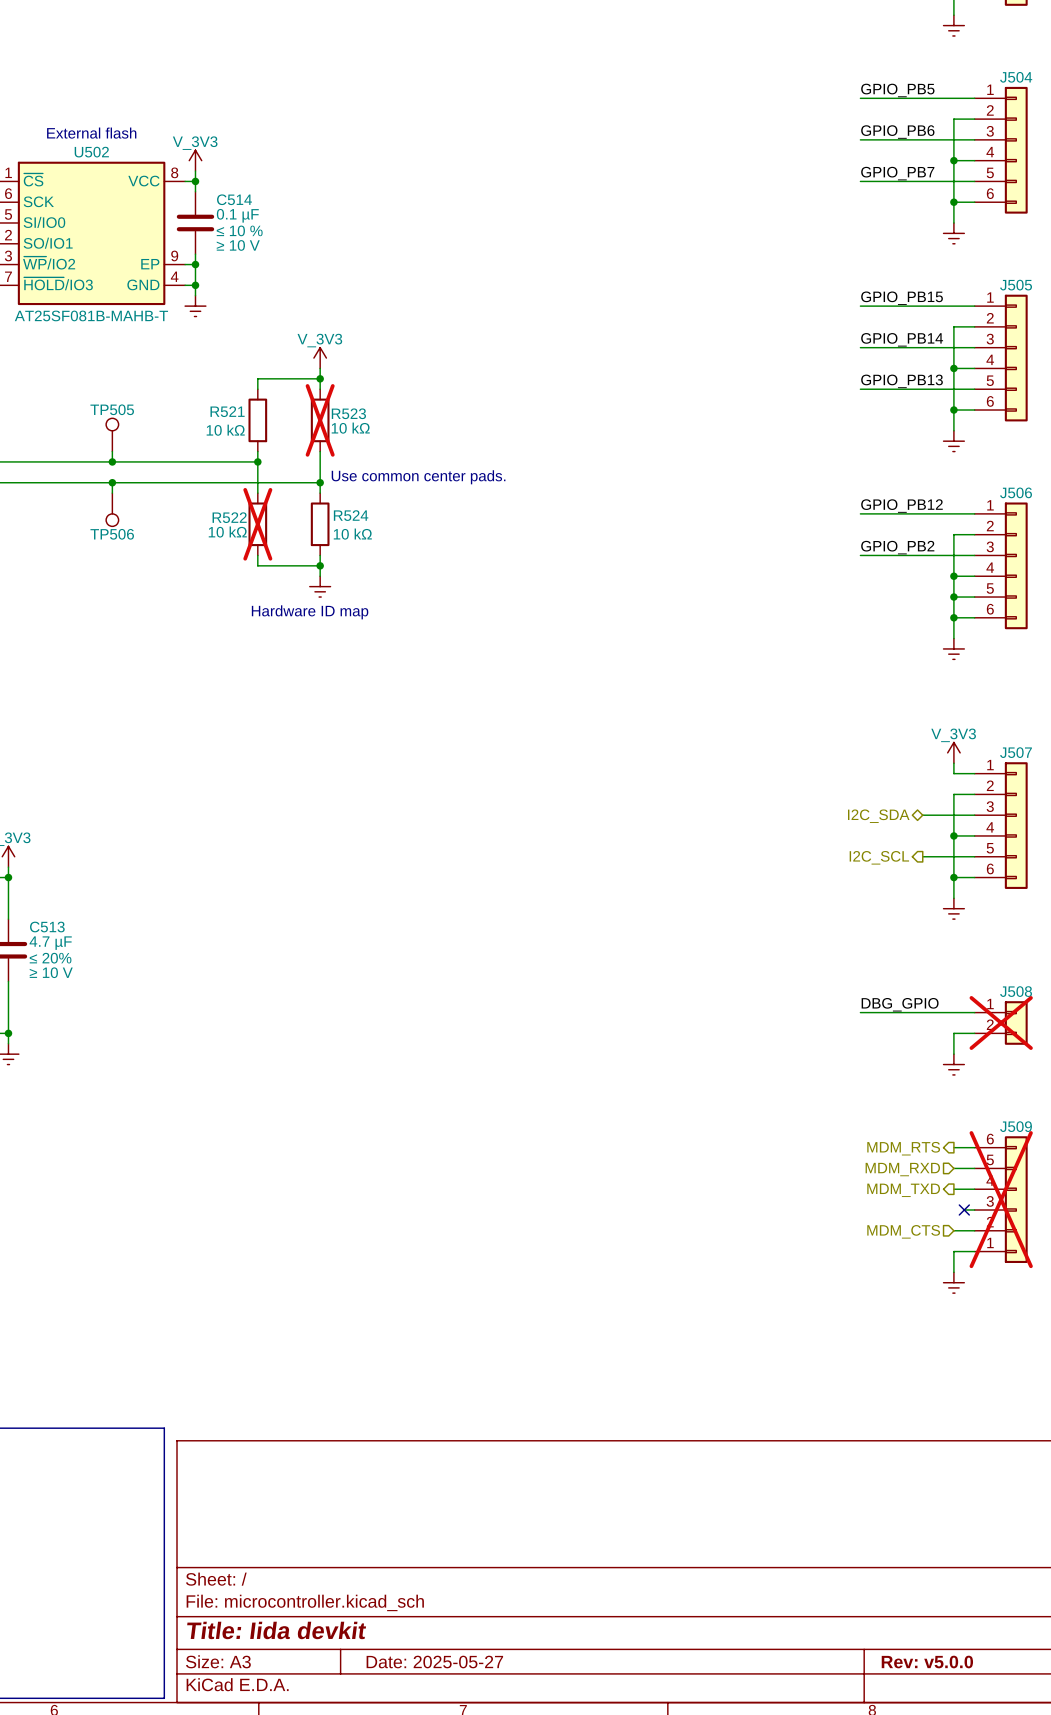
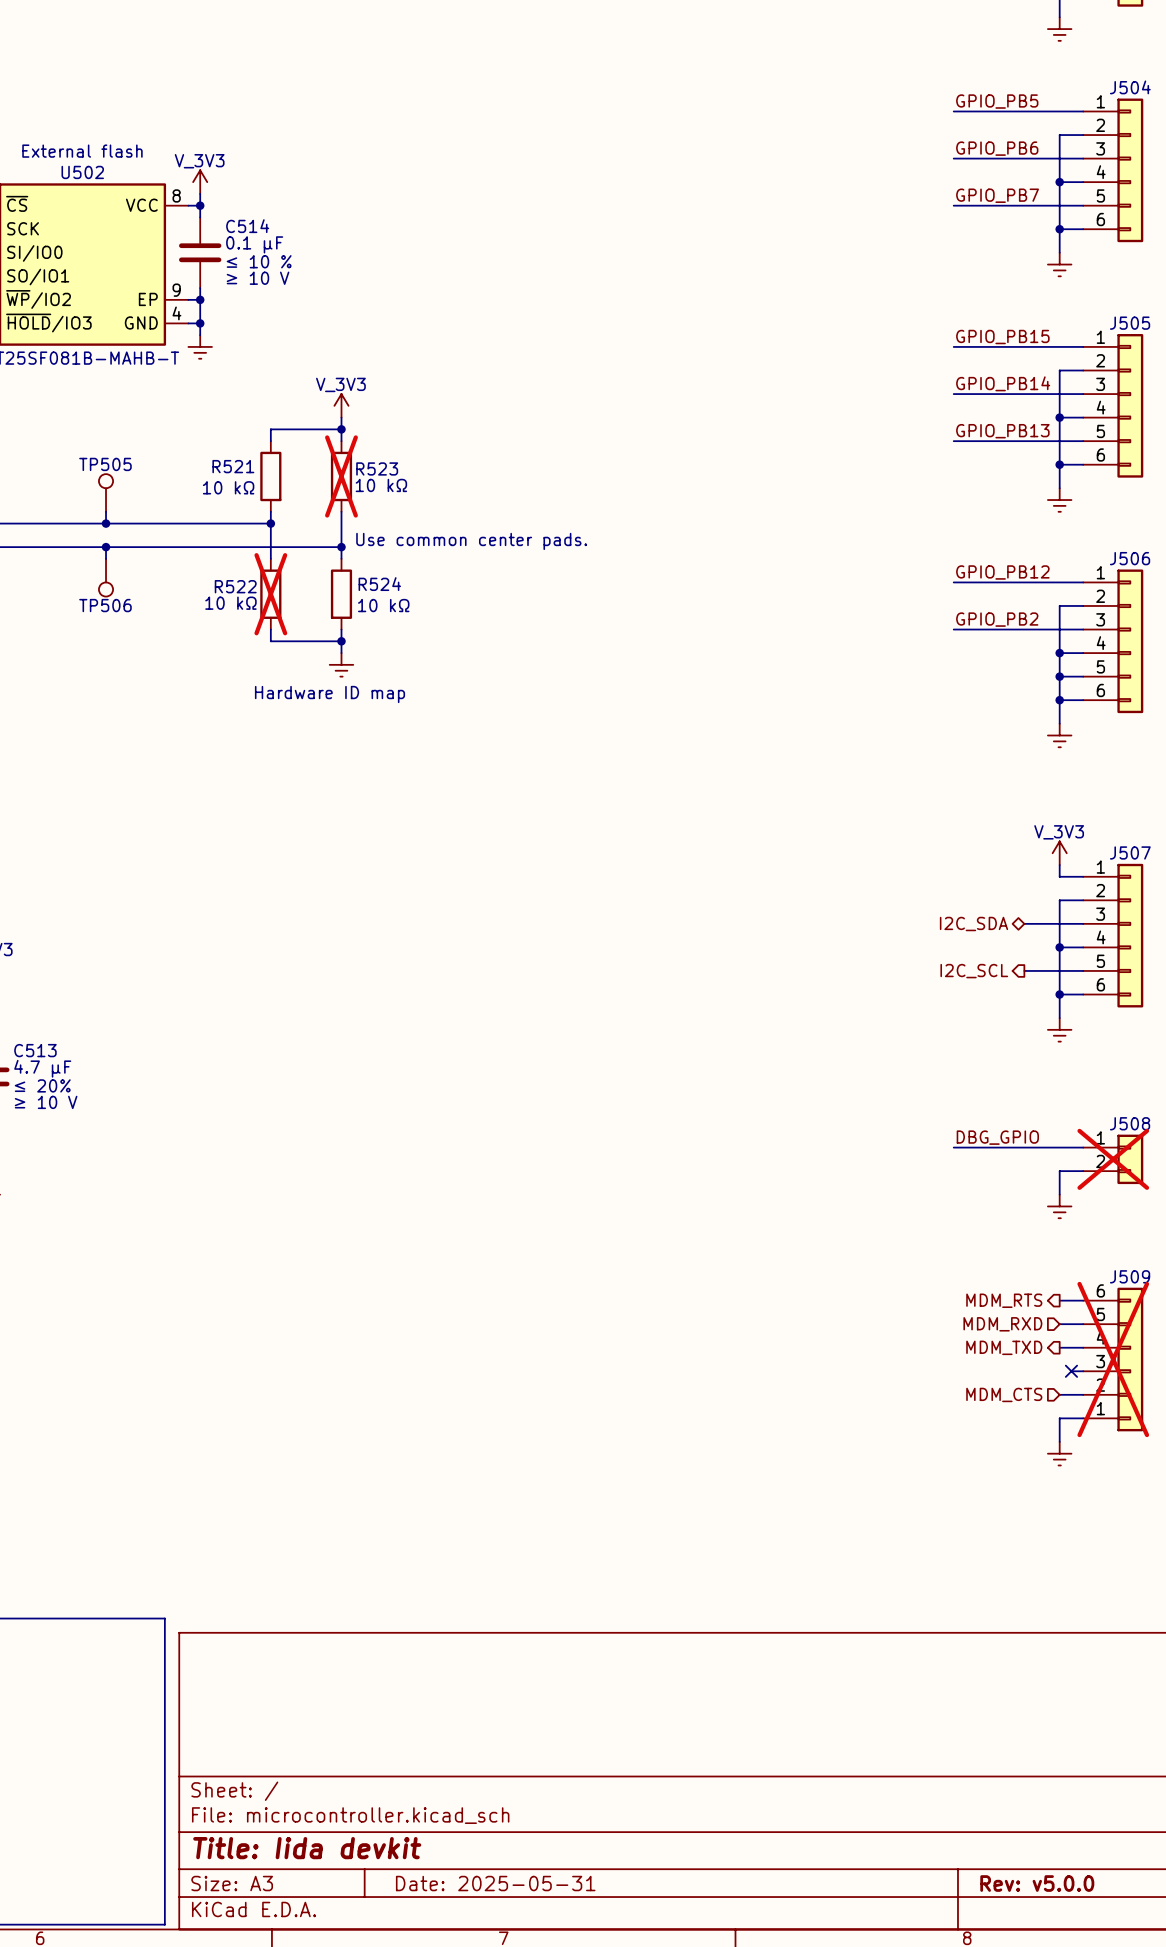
title block: Date: 2025-05-27 (434, 1662) -> Date: 2025-05-31 (495, 1883)

